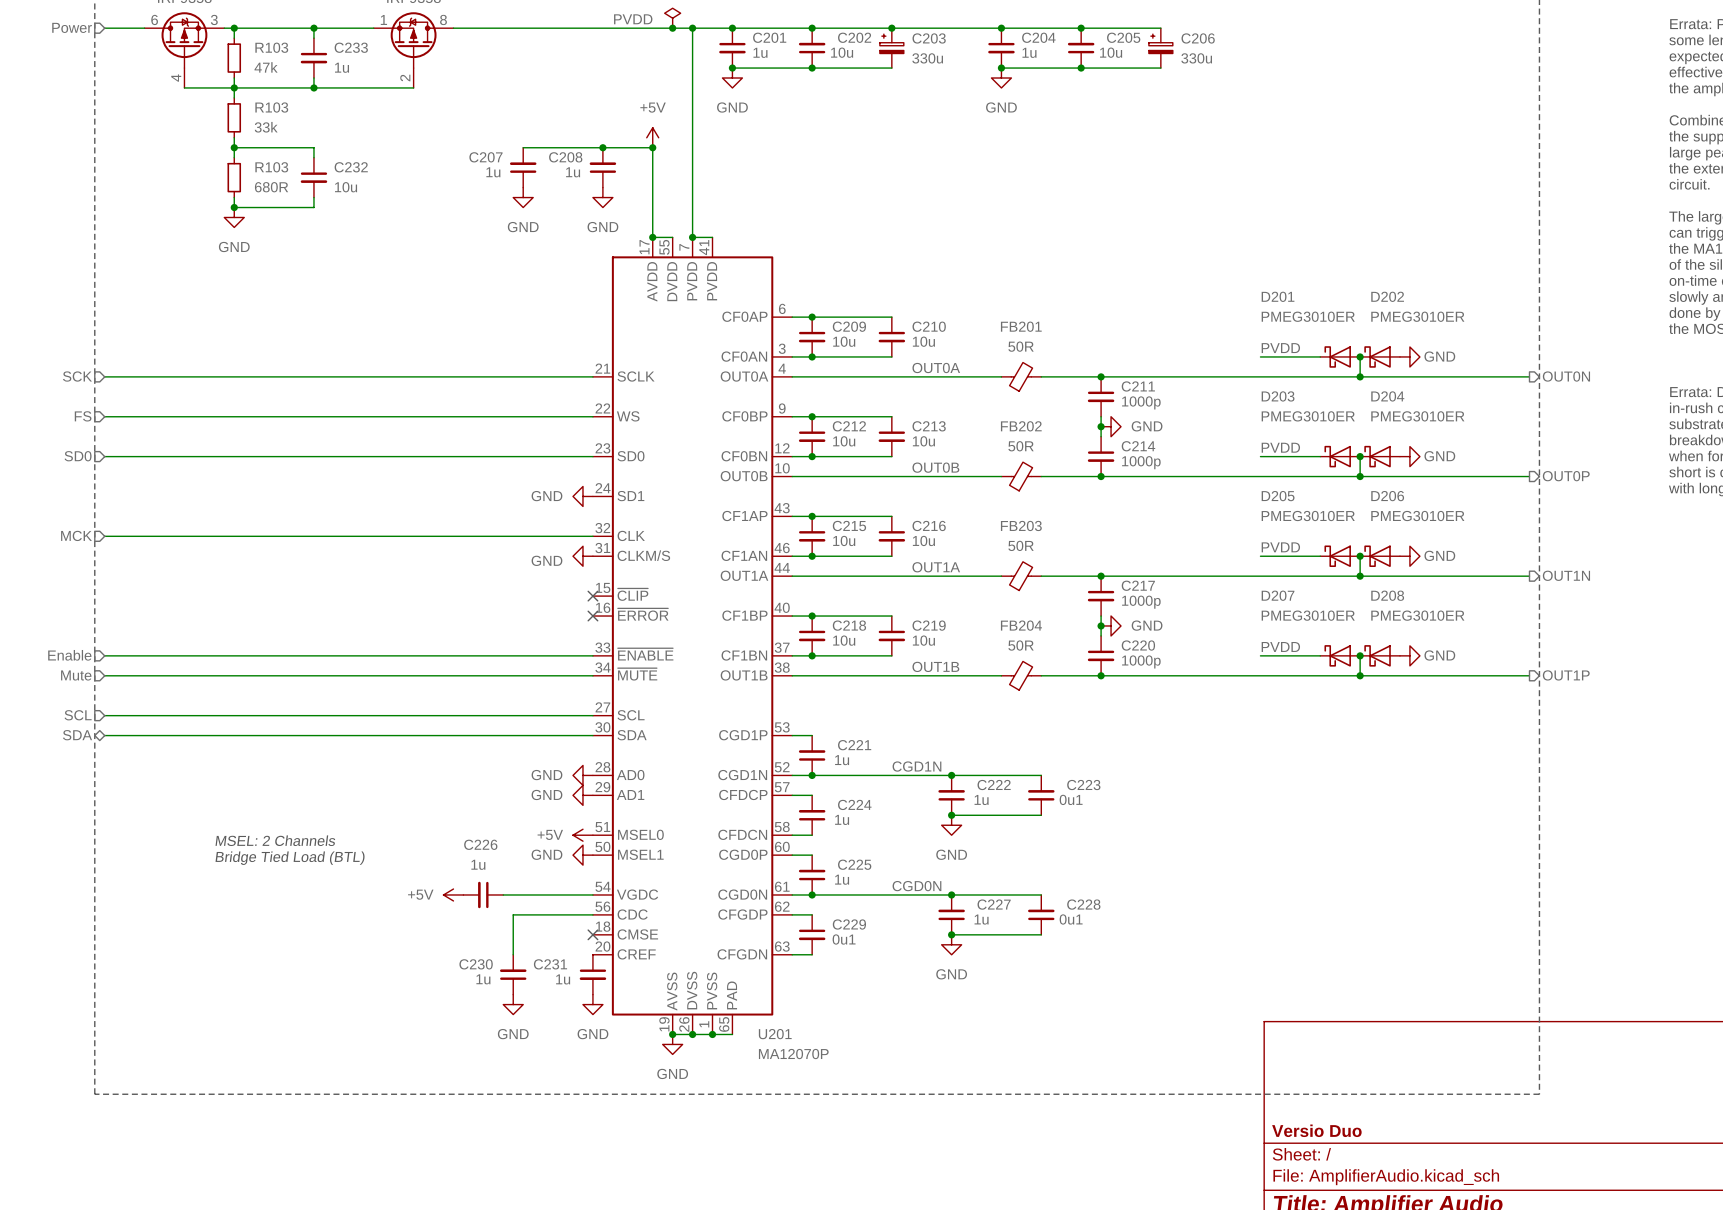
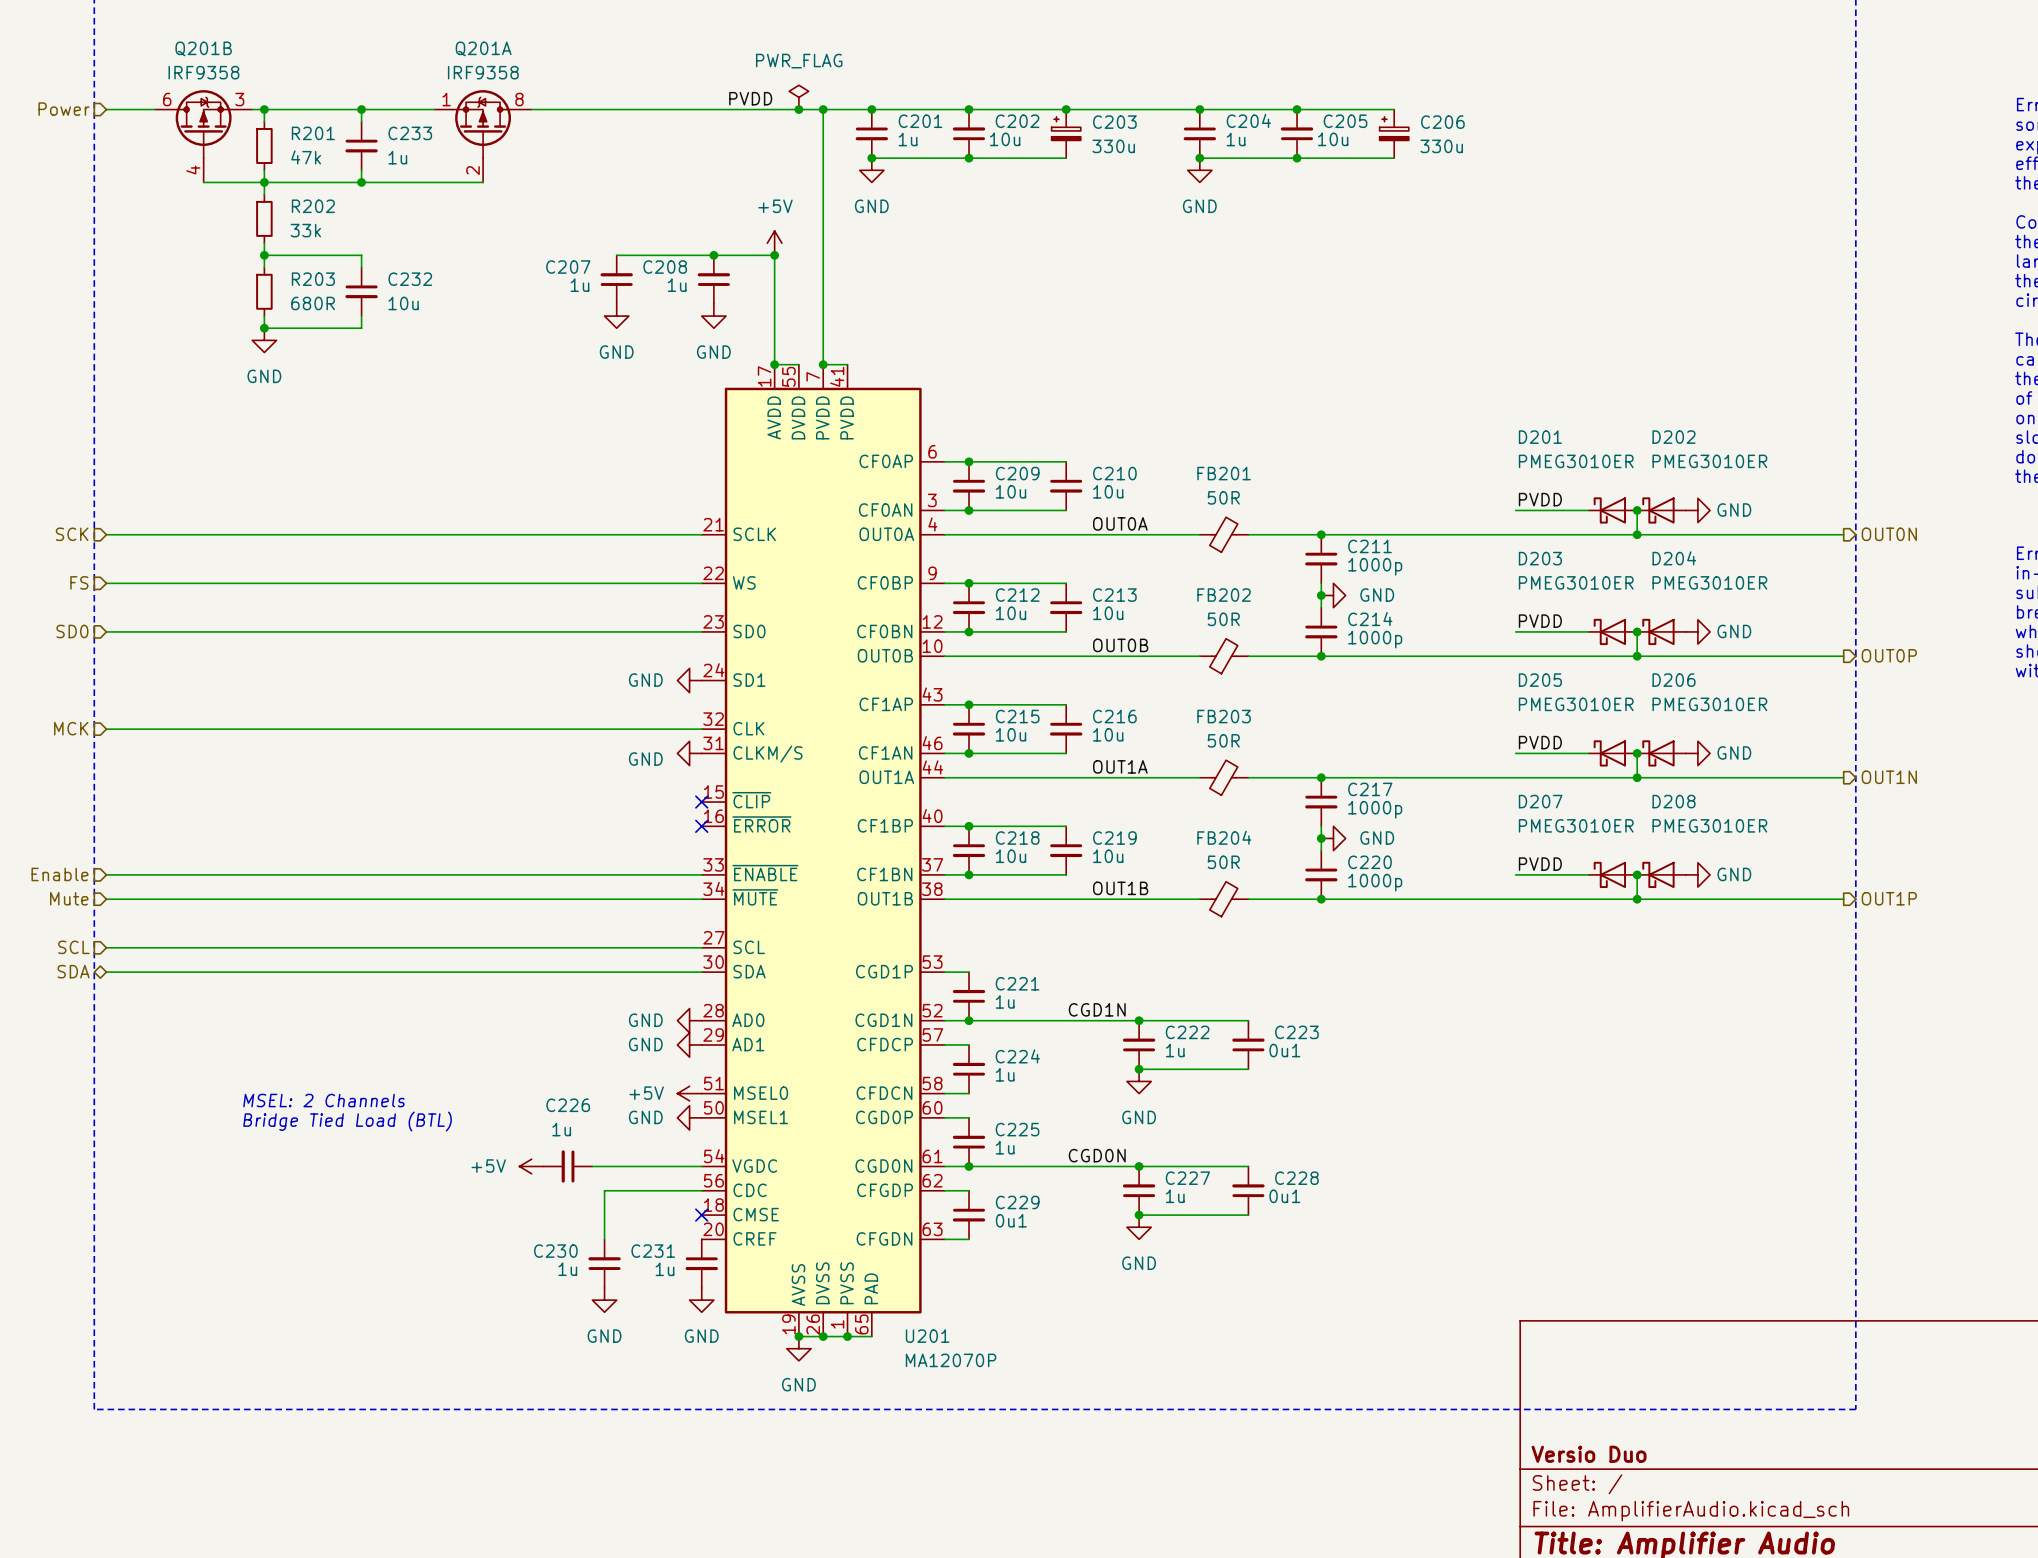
R103 name: R103 (271, 47) -> R201 (313, 133)
R103 name: R103 (271, 107) -> R202 (313, 206)
R103 name: R103 (271, 167) -> R203 (313, 279)

